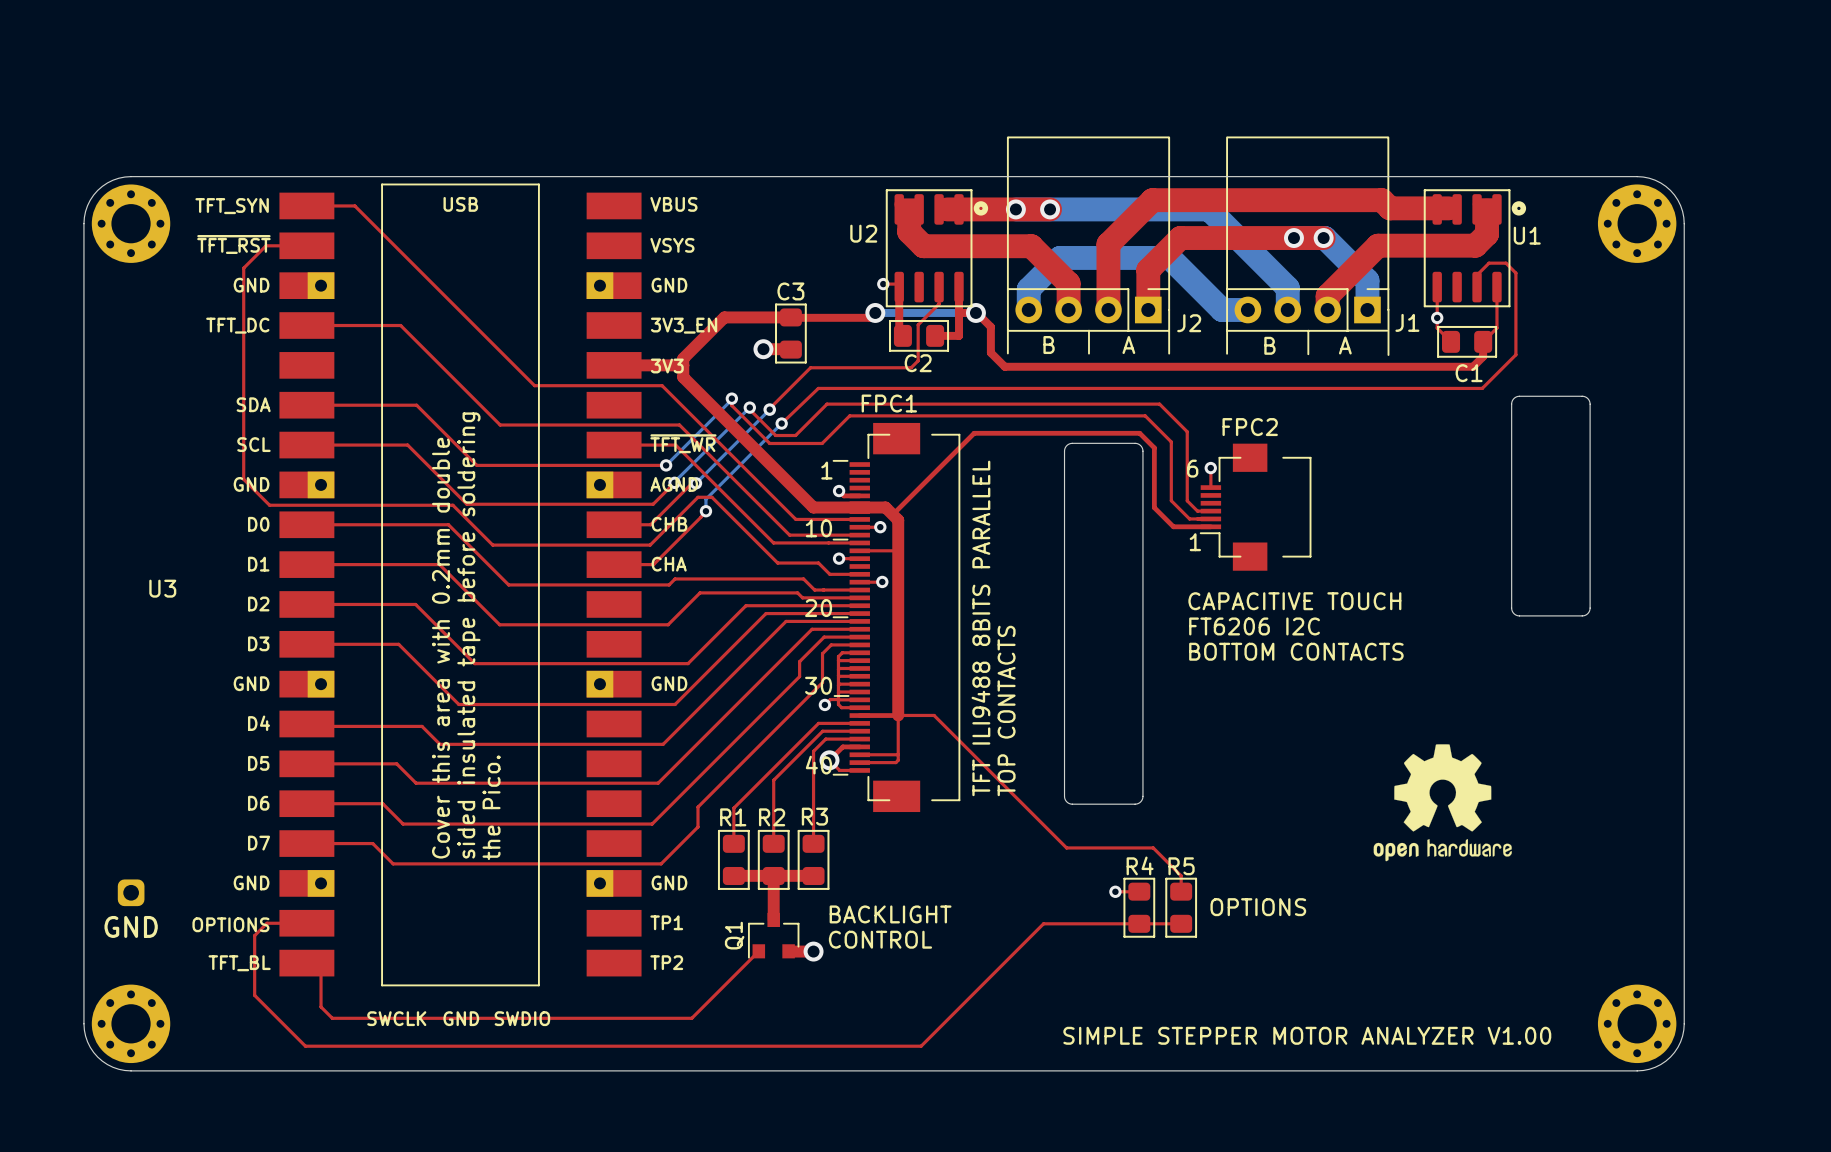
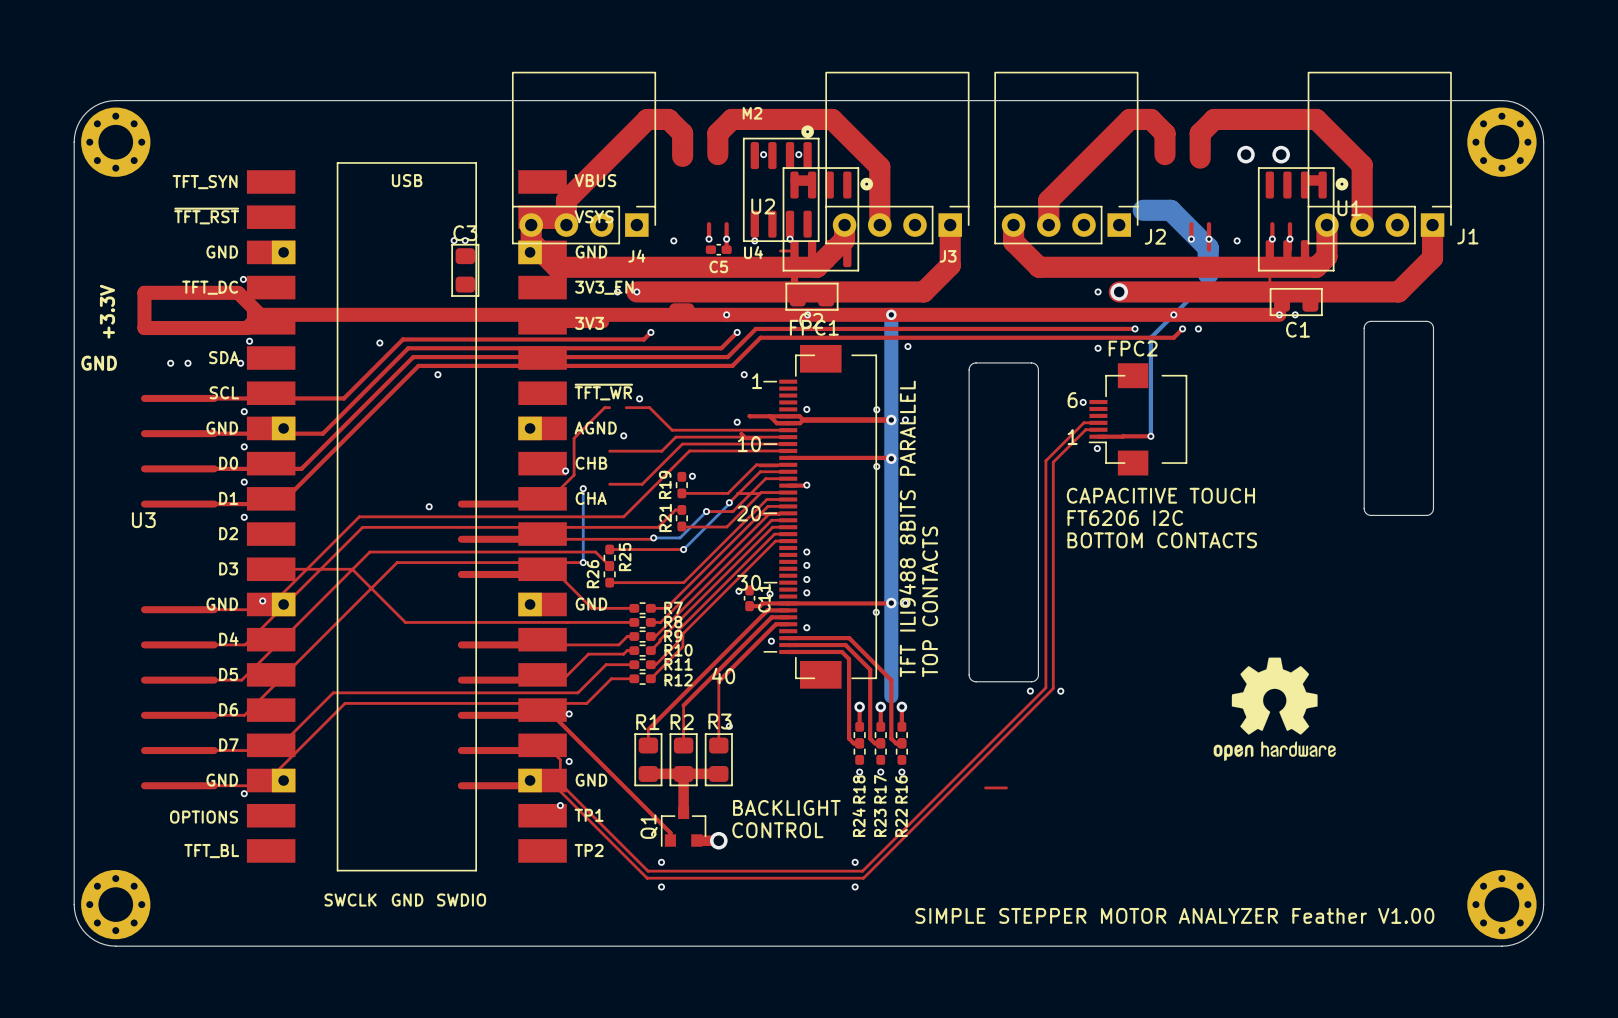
M2: none -> (752, 113)
top track: none -> (717, 154) (717, 133) (731, 119) (832, 119) (879, 166) (879, 225)
via: none -> (763, 154)
via: none -> (798, 154)
top track: none -> (1164, 154) (1164, 133) (1150, 119) (1129, 119) (1048, 200) (1048, 225)
via: none -> (1245, 154)
via: none -> (1281, 154)
top track: none -> (682, 156) (682, 133) (668, 119) (647, 119) (566, 200) (566, 225)
J4: none -> (584, 158)
J3: none -> (897, 158)
top track: none -> (1200, 158) (1200, 133) (1214, 119) (1316, 119) (1362, 165) (1362, 225)
top track: (321, 205) (354, 205) (534, 385) (662, 385) (795, 519) (859, 519) -> none
U4: none -> (781, 183)
top track: (1449, 208) (1390, 208) (1381, 200) (1152, 200) (1108, 244) (1108, 309) -> none
top track: (947, 209) (1050, 209) -> none
bottom track: (1015, 209) (1209, 209) (1287, 288) (1287, 309) -> none
via: (1015, 209) -> none
via: (1050, 209) -> none
top track: (1487, 210) (1487, 234) (1475, 245) (1377, 245) (1327, 296) (1327, 309) -> none
top track: (909, 214) (909, 231) (923, 246) (1031, 246) (1068, 283) (1068, 309) -> none
board edge: (83, 223) (87, 205) (97, 190) (113, 180) (131, 176) (1637, 176) (1649, 178) (1660, 182) (1670, 190) (1677, 200) (1682, 211) (1684, 223) (1684, 1023) (1680, 1041) (1670, 1057) (1655, 1067) (1637, 1070) -> (74, 197) (74, 142) (77, 126) (90, 109) (105, 102) (115, 100) (1502, 100) (1522, 106) (1538, 121) (1543, 142) (1543, 910) (1535, 929) (1517, 943) (1502, 946) (1446, 946)
part position: (131, 223) -> (115, 142)
part position: (1637, 223) -> (1501, 142)
J2 position: (1088, 234) -> (1066, 158)
J1 position: (1307, 234) -> (1379, 158)
via: (1293, 238) -> none
top track: (1323, 238) (1180, 238) (1148, 270) (1148, 309) -> none
via: (1323, 238) -> none
top track: (321, 245) (266, 245) (243, 268) (243, 479) (269, 505) (452, 505) (492, 545) (650, 545) (697, 497) (711, 497) (777, 563) (818, 563) (829, 574) (859, 574) -> none
top track: none -> (709, 224) (709, 239)
top track: none -> (726, 224) (726, 249)
top track: none -> (1191, 224) (1191, 239)
top track: none -> (1208, 224) (1208, 249)
top track: none -> (1272, 224) (1272, 239)
top track: none -> (1289, 224) (1289, 249)
top track: none -> (531, 225) (531, 241) (556, 267) (817, 267) (844, 239) (844, 225)
top track: none -> (950, 225) (950, 265) (923, 291) (636, 291)
top track: none -> (1013, 225) (1013, 241) (1039, 267) (1316, 267) (1326, 256) (1326, 225)
top track: none -> (1432, 225) (1432, 257) (1398, 291) (1119, 291)
via: none -> (709, 239)
via: none -> (726, 239)
via: none -> (790, 239)
via: none -> (1191, 239)
bottom track: none -> (1208, 239) (1208, 279) (1150, 337) (1150, 436)
via: none -> (1208, 239)
via: none -> (1272, 239)
via: none -> (1289, 239)
via: none -> (454, 240)
via: none -> (465, 240)
via: none -> (673, 240)
via: none -> (754, 240)
via: none -> (1237, 240)
C5: none -> (718, 249)
via: (883, 284) -> none
top track: (939, 287) (939, 304) (918, 324) (918, 360) (911, 367) (810, 367) (769, 409) -> none
top track: (959, 287) (959, 335) (935, 335) -> none
top track: (1477, 287) (1477, 275) (1489, 263) (1505, 263) (1515, 273) (1515, 354) (1482, 388) (818, 388) (781, 423) -> none
top track: (1496, 287) (1496, 328) (1483, 341) (1483, 356) (1473, 366) (1004, 366) (990, 352) (990, 326) (976, 312) (959, 312) -> none
bottom track: (1028, 309) (1028, 289) (1060, 257) (1169, 257) (1222, 309) (1247, 309) -> none
line: (1169, 309) (1169, 353) -> none
line: (1388, 309) (1388, 355) -> none
top track: (875, 312) (870, 317) (724, 317) (683, 358) (683, 377) (813, 507) (885, 507) (898, 520) (898, 715) -> none
bottom track: (875, 312) (975, 312) -> none
via: (875, 312) -> none
via: (975, 312) -> none
via: none -> (243, 279)
via: (1437, 317) -> none
top track: (321, 325) (400, 325) (500, 425) (679, 425) (789, 535) (859, 535) -> none
via: none -> (617, 291)
via: none -> (636, 291)
line: (1007, 330) (1007, 353) -> none
line: (1088, 330) (1088, 353) -> none
line: (1128, 330) (1169, 330) -> none
line: (1227, 330) (1227, 353) -> none
via: none -> (1098, 291)
via: none -> (1119, 291)
line: (1308, 330) (1308, 354) -> none
line: (1347, 330) (1386, 330) -> none
C3 position: (790, 333) -> (465, 270)
text: B (1049, 345) -> none
text: A (1128, 345) -> none
text: B (1269, 345) -> none
text: A (1345, 345) -> none
via: (763, 349) -> none
text: none -> +3.3V (107, 311)
top track: none -> (260, 314) (246, 328) (144, 328) (144, 292) (238, 292) (260, 314)
top track: none -> (260, 314) (1279, 314) (1244, 314)
via: none -> (726, 314)
via: none -> (807, 314)
bottom track: none -> (891, 314) (891, 696)
via: none -> (891, 314)
via: none -> (1173, 314)
via: none -> (1279, 314)
via: none -> (1295, 314)
top track: none -> (1135, 328) (755, 328) (727, 357) (413, 357) (301, 468) (144, 468)
via: none -> (1135, 328)
top track: none -> (1182, 328) (1173, 337) (760, 337) (732, 365) (418, 365) (280, 504) (144, 504)
via: none -> (1182, 328)
via: none -> (1198, 328)
top track: none -> (650, 332) (643, 339) (402, 339) (344, 398) (144, 398)
via: none -> (650, 332)
top track: none -> (737, 332) (721, 348) (408, 348) (322, 433) (144, 433)
via: none -> (737, 332)
via: none -> (249, 341)
via: none -> (379, 343)
via: none -> (907, 346)
via: none -> (1098, 348)
board edge: (1519, 396) (1583, 396) (1589, 402) (1590, 608) (1588, 612) (1584, 615) (1518, 615) (1511, 610) (1511, 404) (1513, 398) (1519, 396) -> (1371, 321) (1427, 321) (1433, 326) (1433, 508) (1428, 515) (1370, 515) (1364, 510) (1364, 328) (1366, 323) (1371, 321)
top track: (731, 398) (731, 405) (769, 443) (822, 443) (849, 415) (1145, 415) (1171, 441) (1171, 500) (1189, 518) (1210, 518) -> none
bottom track: (731, 398) (666, 465) -> none
via: (731, 398) -> none
top track: (321, 405) (416, 405) (476, 465) (666, 465) -> none
top track: (749, 407) (775, 435) (795, 435) (827, 404) (1159, 404) (1187, 431) (1187, 500) (1197, 511) (1210, 511) -> none
bottom track: (749, 407) (674, 482) -> none
via: (749, 407) -> none
bottom track: (769, 409) (696, 483) -> none
via: (769, 409) -> none
text: none -> GND (99, 363)
via: none -> (170, 363)
via: none -> (187, 363)
via: none -> (240, 363)
bottom track: (781, 423) (705, 499) (705, 511) -> none
via: (781, 423) -> none
via: none -> (437, 374)
via: none -> (744, 374)
board edge: (1072, 443) (1136, 443) (1140, 445) (1142, 450) (1142, 796) (1141, 801) (1136, 804) (1071, 804) (1066, 801) (1064, 797) (1064, 451) (1066, 445) (1072, 443) -> (976, 362) (1032, 363) (1038, 368) (1038, 674) (1036, 679) (1032, 681) (975, 681) (969, 675) (969, 369) (971, 364) (976, 362)
top track: (321, 445) (407, 445) (466, 504) (653, 504) (674, 482) -> none
top track: (599, 445) (675, 445) (773, 542) (859, 542) -> none
via: none -> (639, 398)
via: none -> (1083, 402)
line: (833, 460) (847, 460) -> (764, 381) (776, 381)
top track: none -> (609, 407) (604, 407) (574, 438) (574, 475) (545, 504) (461, 504)
top track: none -> (626, 407) (649, 407) (672, 430) (788, 430)
via: none -> (806, 409)
via: none -> (876, 409)
via: none -> (244, 411)
via: (666, 465) -> none
text position: 6 (1192, 468) -> 6 (1072, 400)
top track: (1210, 468) (1210, 487) -> none
via: (1210, 468) -> none
text position: 1 (826, 470) -> 1 (757, 381)
top track: none -> (749, 416) (799, 416) (803, 419)
top track: none -> (770, 416) (776, 423) (800, 423) (803, 419)
top track: none -> (803, 419) (891, 419)
via: none -> (891, 419)
via: none -> (905, 419)
via: none -> (737, 422)
top track: none -> (1098, 422) (1083, 422) (1045, 460) (1045, 687) (862, 871) (648, 871) (560, 783) (560, 759) (551, 750) (461, 750)
via: (674, 482) -> none
top track: (696, 483) (692, 483) (650, 524) (599, 524) -> none
via position: (696, 483) -> (623, 435)
top track: none -> (1098, 429) (1085, 429) (1053, 462) (1053, 688) (863, 878) (647, 878) (554, 785) (461, 785)
via: (839, 491) -> none
top track: none -> (1150, 436) (1098, 436)
via: none -> (1150, 436)
top track: none -> (788, 437) (675, 437) (661, 451) (609, 451)
top track: none -> (788, 444) (682, 444) (642, 484) (609, 484)
via: none -> (244, 446)
via: none -> (1097, 448)
FPC2 position: (1255, 507) -> (1137, 419)
top track: (705, 511) (653, 564) (599, 564) -> none
via: (705, 511) -> none
top track: (890, 516) (974, 433) (1139, 433) (1154, 447) (1154, 507) (1173, 526) (1210, 526) -> none
top track: none -> (788, 457) (891, 458)
via: none -> (891, 458)
top track: (321, 524) (448, 524) (508, 584) -> (144, 609) (266, 609) (359, 516) (449, 516)
top track: none -> (788, 464) (756, 464) (727, 493) (681, 493)
via: (880, 527) -> none
text position: 10 (818, 528) -> 10 (749, 444)
via: none -> (876, 466)
via: none -> (565, 471)
top track: none -> (788, 471) (760, 471) (729, 502)
via: none -> (692, 476)
line: (833, 539) (847, 539) -> (764, 444) (776, 444)
text position: 1 (1195, 542) -> 1 (1072, 437)
via: none -> (244, 482)
R19: none -> (681, 485)
top track: none -> (806, 485) (788, 485)
via: none -> (806, 485)
top track: (859, 550) (898, 551) -> none
bottom track: none -> (583, 488) (583, 562)
via: none -> (583, 488)
top track: none -> (788, 492) (761, 492) (726, 527) (681, 526)
via: (839, 558) -> none
top track: (321, 564) (439, 564) (499, 624) -> (144, 680) (241, 680) (369, 552) (441, 552)
top track: none -> (788, 499) (766, 499) (683, 582) (609, 582)
bottom track: none -> (729, 502) (683, 549)
via: none -> (729, 502)
via: none -> (429, 506)
top track: none -> (788, 506) (767, 506) (665, 608) (650, 608)
top track: none -> (681, 509) (675, 509) (658, 527) (362, 527) (245, 644) (144, 644)
top track: (799, 578) (675, 578) (669, 584) -> (788, 450) (689, 450) (623, 516) (591, 516)
bottom track: none -> (706, 511) (680, 537) (653, 537)
via: none -> (706, 511)
top track: (803, 578) (814, 590) (859, 590) -> (710, 511) (732, 511) (765, 478) (788, 478)
via: (882, 581) -> none
top track: none -> (788, 513) (769, 513) (660, 622) (650, 622)
via: none -> (244, 517)
R21: none -> (681, 518)
top track: none -> (788, 520) (771, 520) (655, 636) (650, 636)
top track: none -> (788, 527) (772, 527) (650, 650)
top track: (859, 597) (802, 597) (797, 592) (699, 592) (668, 624) -> (609, 566) (595, 552) (590, 552)
text position: CAPACITIVE TOUCH (1294, 601) -> CAPACITIVE TOUCH (1160, 495)
top track: (321, 604) (415, 604) (474, 663) (688, 663) (745, 605) (859, 605) -> none
top track: none -> (788, 534) (774, 534) (677, 631) (677, 643) (655, 664) (650, 664)
top track: none -> (653, 537) (461, 539)
via: none -> (653, 537)
text position: 20 (818, 608) -> 20 (749, 513)
top track: none -> (788, 541) (775, 541) (682, 633) (682, 646) (650, 678)
top track: (859, 613) (766, 613) (675, 704) -> (634, 622) (596, 622)
line: (833, 617) (847, 617) -> (764, 513) (776, 513)
FPC1 position: (904, 617) -> (828, 516)
top track: none -> (609, 549) (683, 549)
top track: (859, 621) (786, 621) (663, 744) (439, 744) (422, 726) (323, 726) (321, 724) -> none
via: none -> (683, 549)
via: none -> (806, 552)
text position: FT6206 I2C (1254, 626) -> FT6206 I2C (1125, 518)
text position: TFT ILI9488 8BITS PARALLEL (980, 628) -> TFT ILI9488 8BITS PARALLEL (907, 528)
top track: (859, 629) (812, 629) (658, 783) (416, 783) (396, 763) (321, 763) -> none
R25: none -> (609, 557)
text: sided insulated tape before soldering (468, 635) -> none
top track: none -> (583, 562) (397, 562) (244, 715) (144, 715)
via: none -> (583, 562)
top track: (859, 637) (824, 637) (799, 661) (799, 676) (652, 824) (403, 824) (382, 803) (321, 803) -> none
via: none -> (806, 565)
top track: (859, 644) (831, 644) (822, 653) (822, 682) (697, 807) (697, 827) (661, 863) (393, 863) (372, 843) (321, 843) -> none
text: Cover this area with 0.2mm double (441, 648) -> none
top track: none -> (461, 574) (558, 574) (592, 608) (634, 608)
R26: none -> (609, 574)
text position: BOTTOM CONTACTS (1296, 651) -> BOTTOM CONTACTS (1162, 540)
top track: (859, 652) (842, 652) (838, 656) (838, 704) (841, 707) (859, 707) -> none
via: none -> (806, 579)
top track: (838, 660) (859, 660) -> none
top track: (859, 668) (838, 669) -> none
via: none -> (738, 591)
via: none -> (806, 592)
via: none -> (770, 594)
top track: (838, 675) (859, 676) -> none
C11: none -> (749, 598)
via: none -> (262, 601)
top track: none -> (891, 603) (762, 603) (759, 606) (749, 606)
via: none -> (891, 603)
via: none -> (905, 603)
top track: (859, 684) (838, 685) -> none
text position: 30 (818, 685) -> 30 (749, 582)
R7: none -> (642, 608)
top track: (859, 692) (838, 692) -> none
via: none -> (876, 612)
line: (834, 695) (848, 695) -> (764, 582) (776, 582)
top track: (859, 699) (830, 699) (824, 704) -> none
R8: none -> (642, 622)
via: (824, 704) -> none
via: none -> (806, 627)
text position: TOP CONTACTS (1006, 710) -> TOP CONTACTS (930, 601)
top track: (859, 715) (898, 715) -> none
top track: (898, 715) (898, 760) (895, 762) (859, 762) -> none
top track: (898, 715) (934, 715) (1066, 847) (1153, 847) (1181, 875) (1181, 891) -> none
top track: none -> (634, 636) (627, 636) (618, 644) (461, 644)
R9: none -> (642, 636)
top track: none -> (788, 638) (849, 638) (891, 680) (891, 738) (896, 743) (901, 743)
top track: (859, 723) (818, 723) (733, 808) (733, 825) -> (788, 610) (767, 610) (648, 729)
via: none -> (771, 641)
top track: none -> (788, 645) (845, 645) (870, 669) (870, 738) (874, 743) (880, 743)
top track: (859, 731) (822, 731) (773, 780) (773, 798) -> (788, 617) (771, 617) (683, 705)
top track: none -> (634, 650) (627, 650) (623, 654) (588, 654) (562, 680) (461, 680)
R10: none -> (642, 650)
top track: none -> (788, 651) (841, 651) (849, 659) (849, 738) (853, 743) (859, 743)
top track: (859, 739) (825, 739) (813, 751) (813, 771) -> (788, 624) (776, 624) (718, 681)
top track: (859, 746) (842, 746) (829, 760) (839, 770) (859, 770) -> none
top track: none -> (634, 664) (606, 664) (577, 692) (333, 692) (275, 750) (144, 750)
R11: none -> (642, 664)
top track: (898, 754) (859, 754) -> none
via: (829, 760) -> none
top track: none -> (634, 678) (611, 678) (586, 703) (345, 703) (262, 785) (144, 785)
R12: none -> (642, 678)
line: (833, 774) (847, 774) -> (764, 651) (776, 651)
via: none -> (1030, 691)
via: none -> (1060, 691)
top track: none -> (859, 706) (859, 726)
via: none -> (859, 706)
top track: none -> (880, 706) (880, 726)
via: none -> (880, 706)
top track: none -> (901, 706) (901, 726)
via: none -> (901, 706)
text: the Pico. (491, 807) -> none
via: none -> (569, 713)
via: none -> (729, 726)
R18: none -> (859, 735)
R17: none -> (880, 735)
R16: none -> (901, 735)
R24: none -> (859, 751)
R23: none -> (880, 751)
R22: none -> (901, 751)
via: none -> (569, 761)
via: none -> (859, 772)
via: none -> (880, 772)
via: none -> (901, 772)
via: (1115, 891) -> none
part: (131, 892) -> none
via: none -> (244, 793)
R4: (1139, 907) -> none
R5: (1181, 907) -> none
text: OPTIONS (1258, 907) -> none
via: none -> (560, 805)
top track: (321, 923) (267, 923) (254, 935) (254, 995) (305, 1046) (921, 1046) (1043, 923) (1181, 923) -> none
text: GND (131, 926) -> none
top track: (758, 951) (691, 1018) (332, 1018) (321, 1006) (321, 963) (331, 963) -> (670, 840) (670, 832) (552, 715) (461, 715)
via: none -> (661, 862)
via: none -> (855, 862)
via: none -> (661, 886)
via: none -> (855, 886)
part position: (1637, 1023) -> (1501, 904)
text: SIMPLE STEPPER MOTOR ANALYZER V1.00 (1307, 1035) -> SIMPLE STEPPER MOTOR ANALYZER Feather V1.00 (1174, 915)

